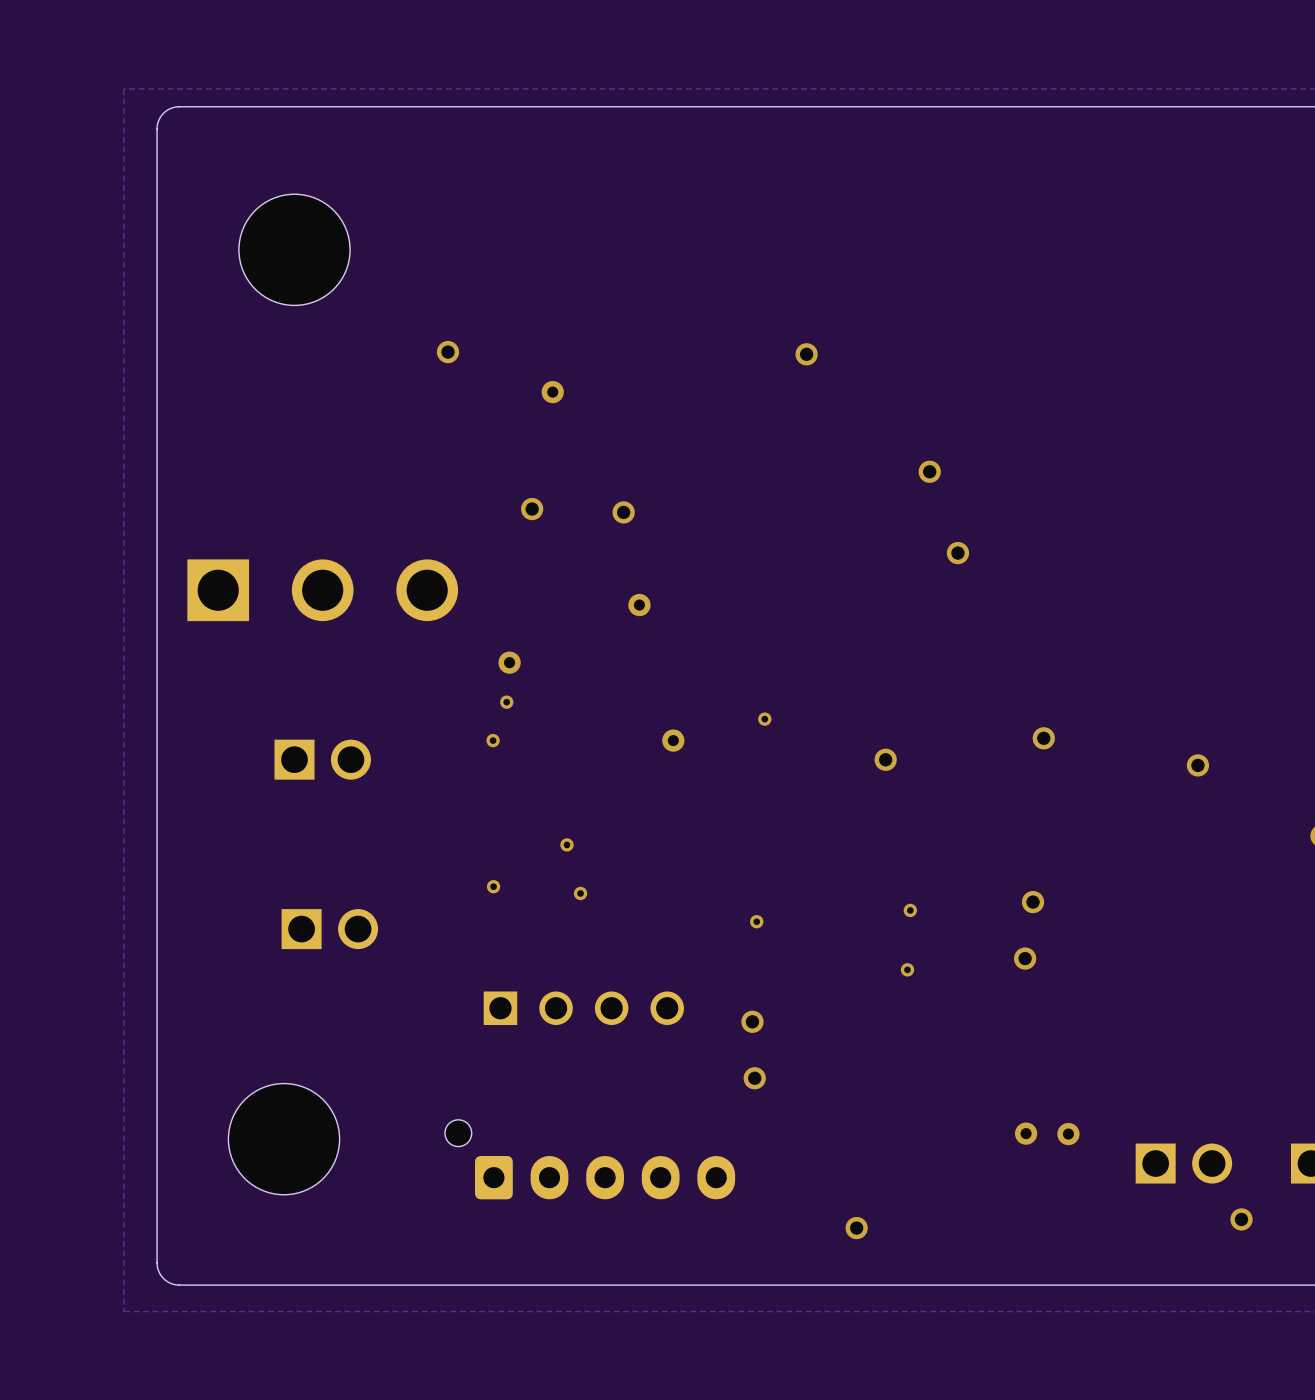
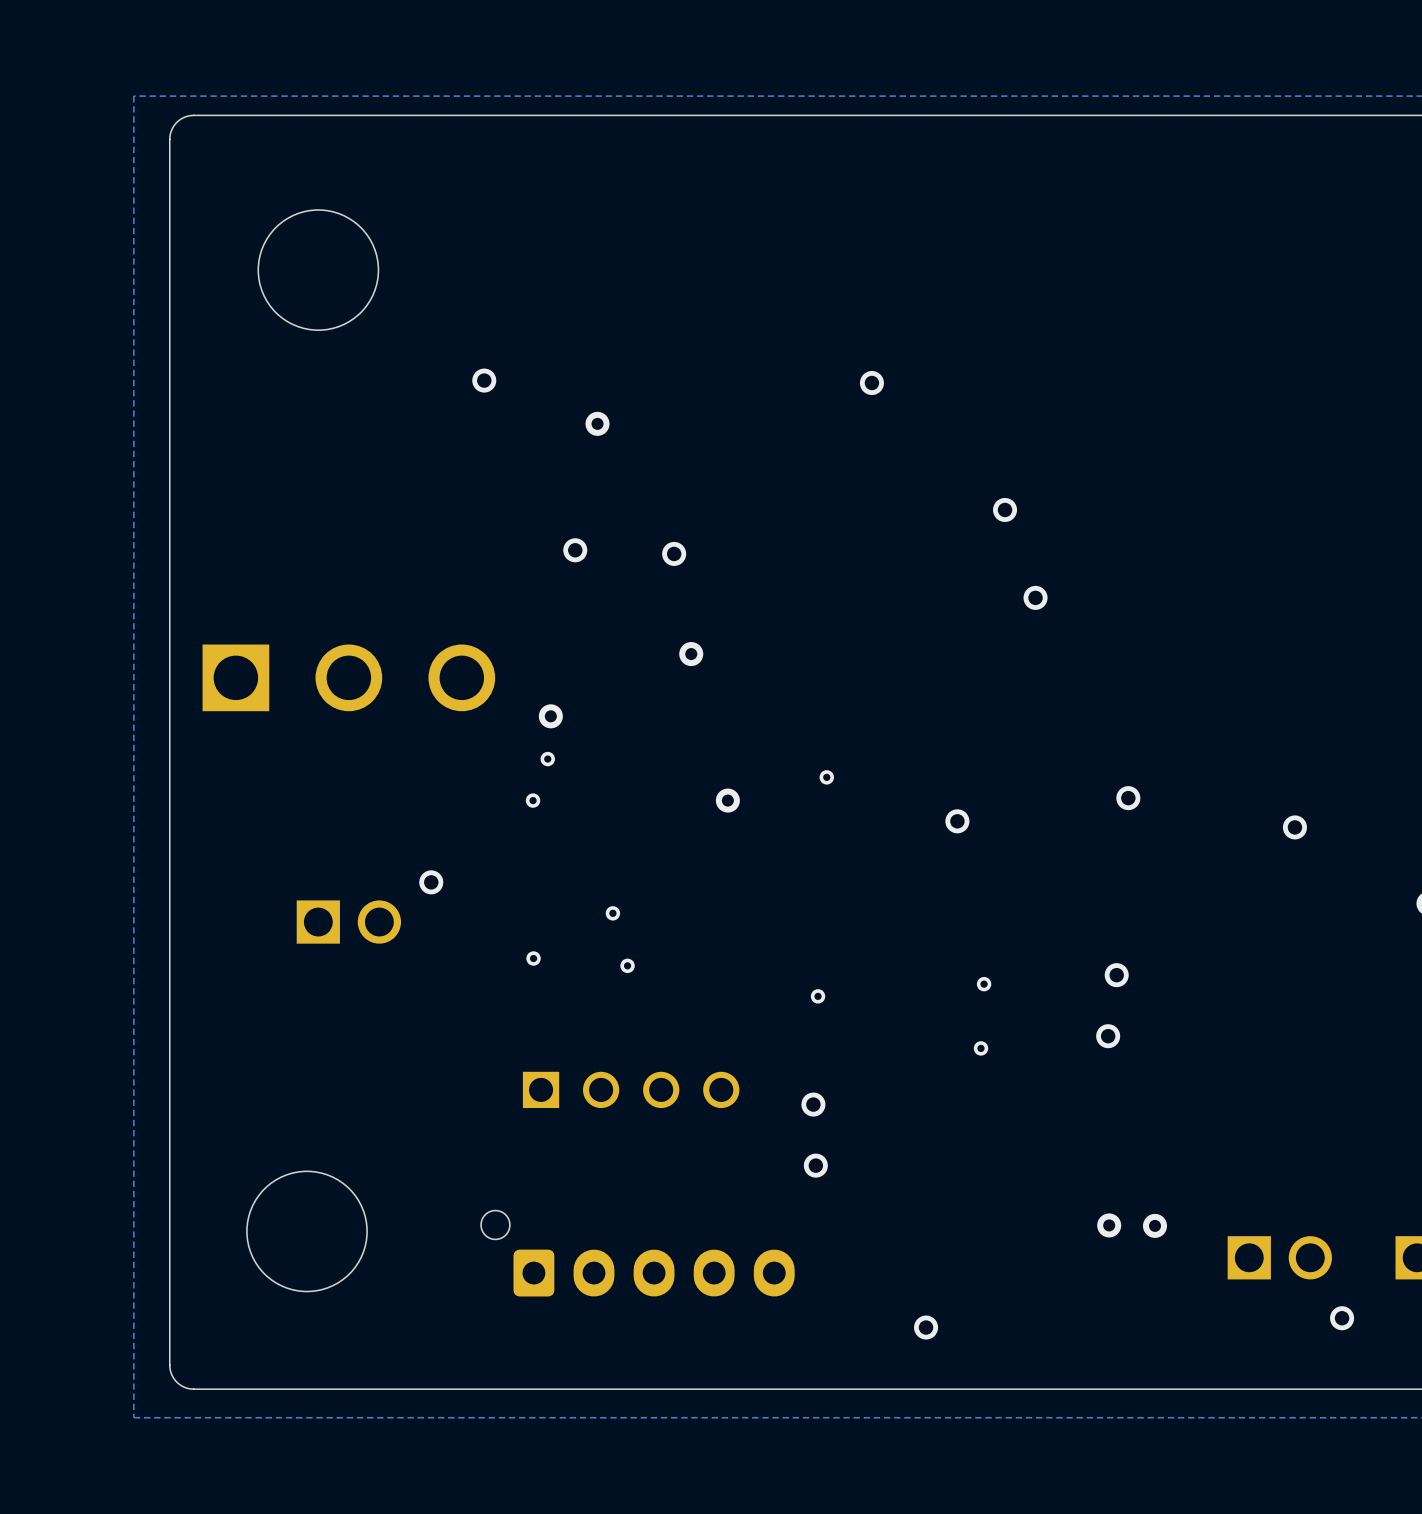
part position: (322, 590) -> (348, 677)
part: (322, 759) -> none
via: none -> (431, 882)
part: none -> (348, 922)
part: (329, 929) -> none

